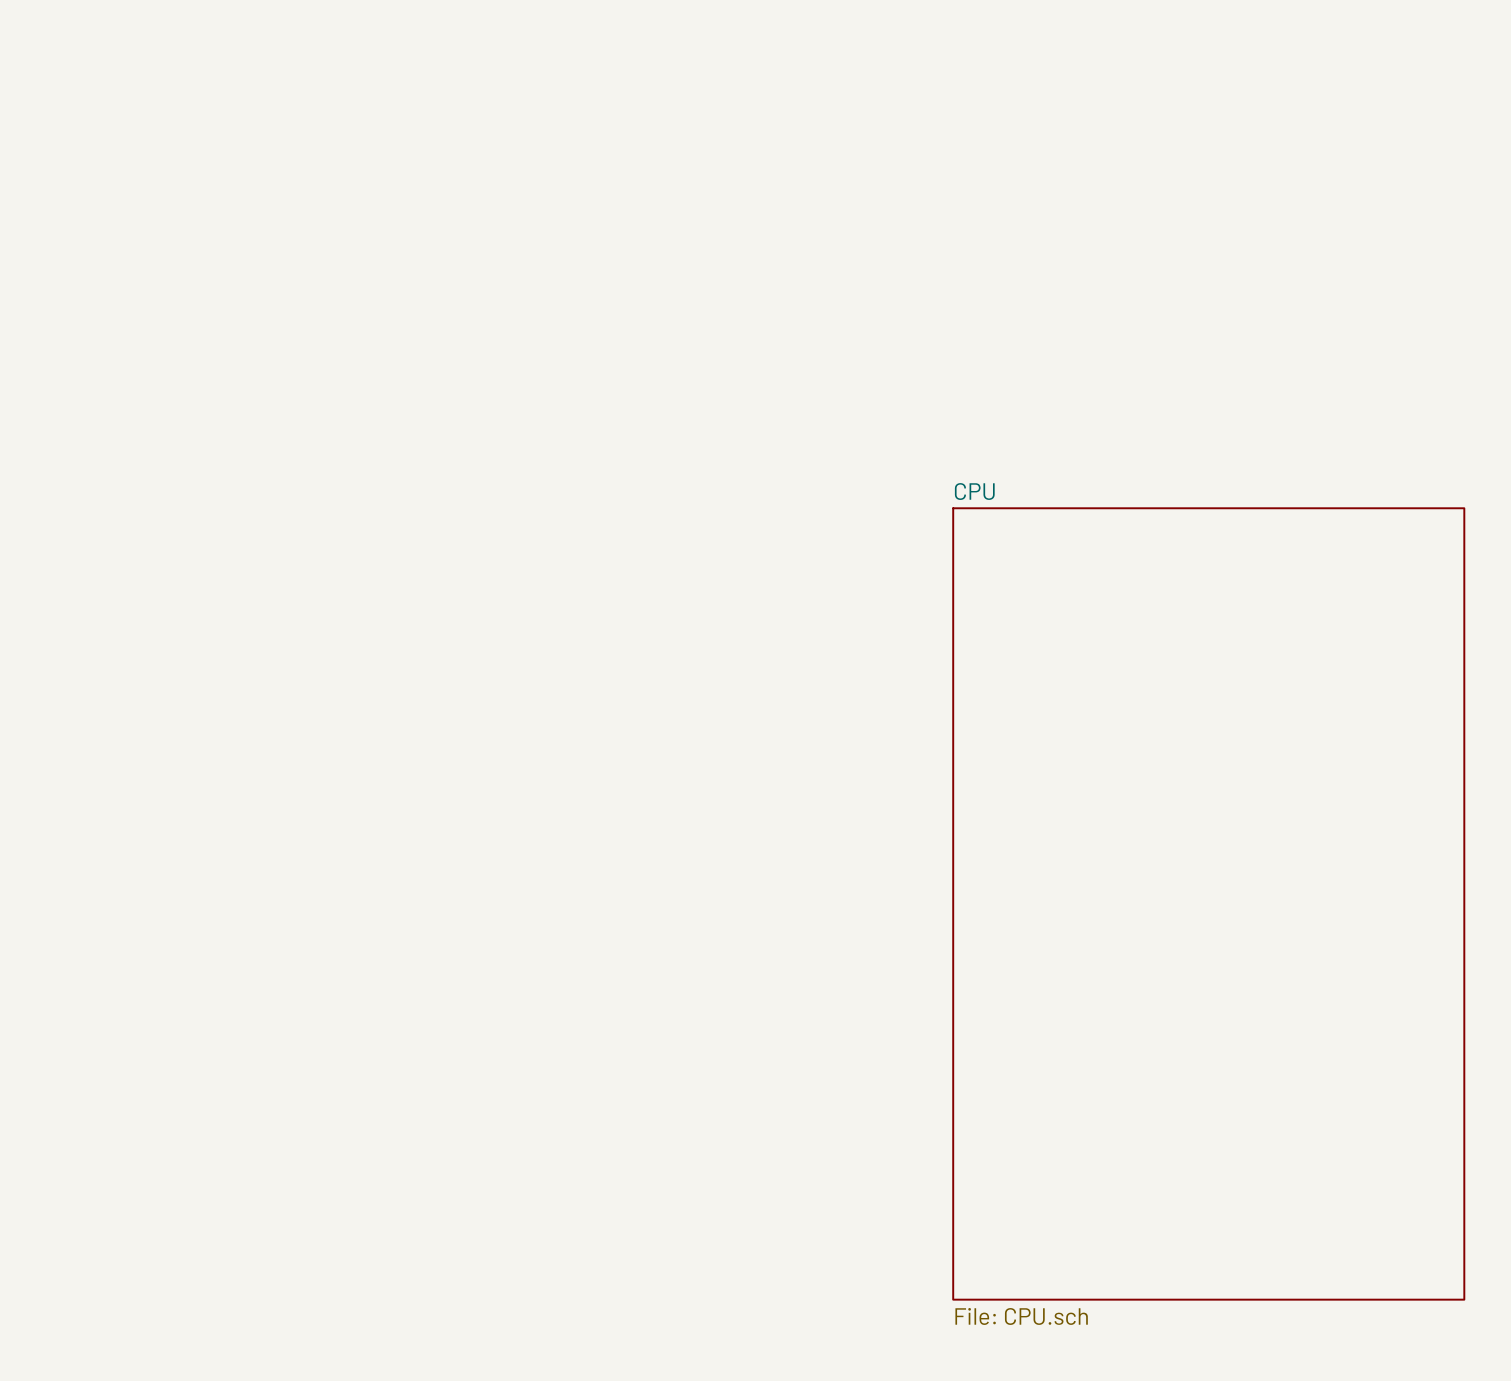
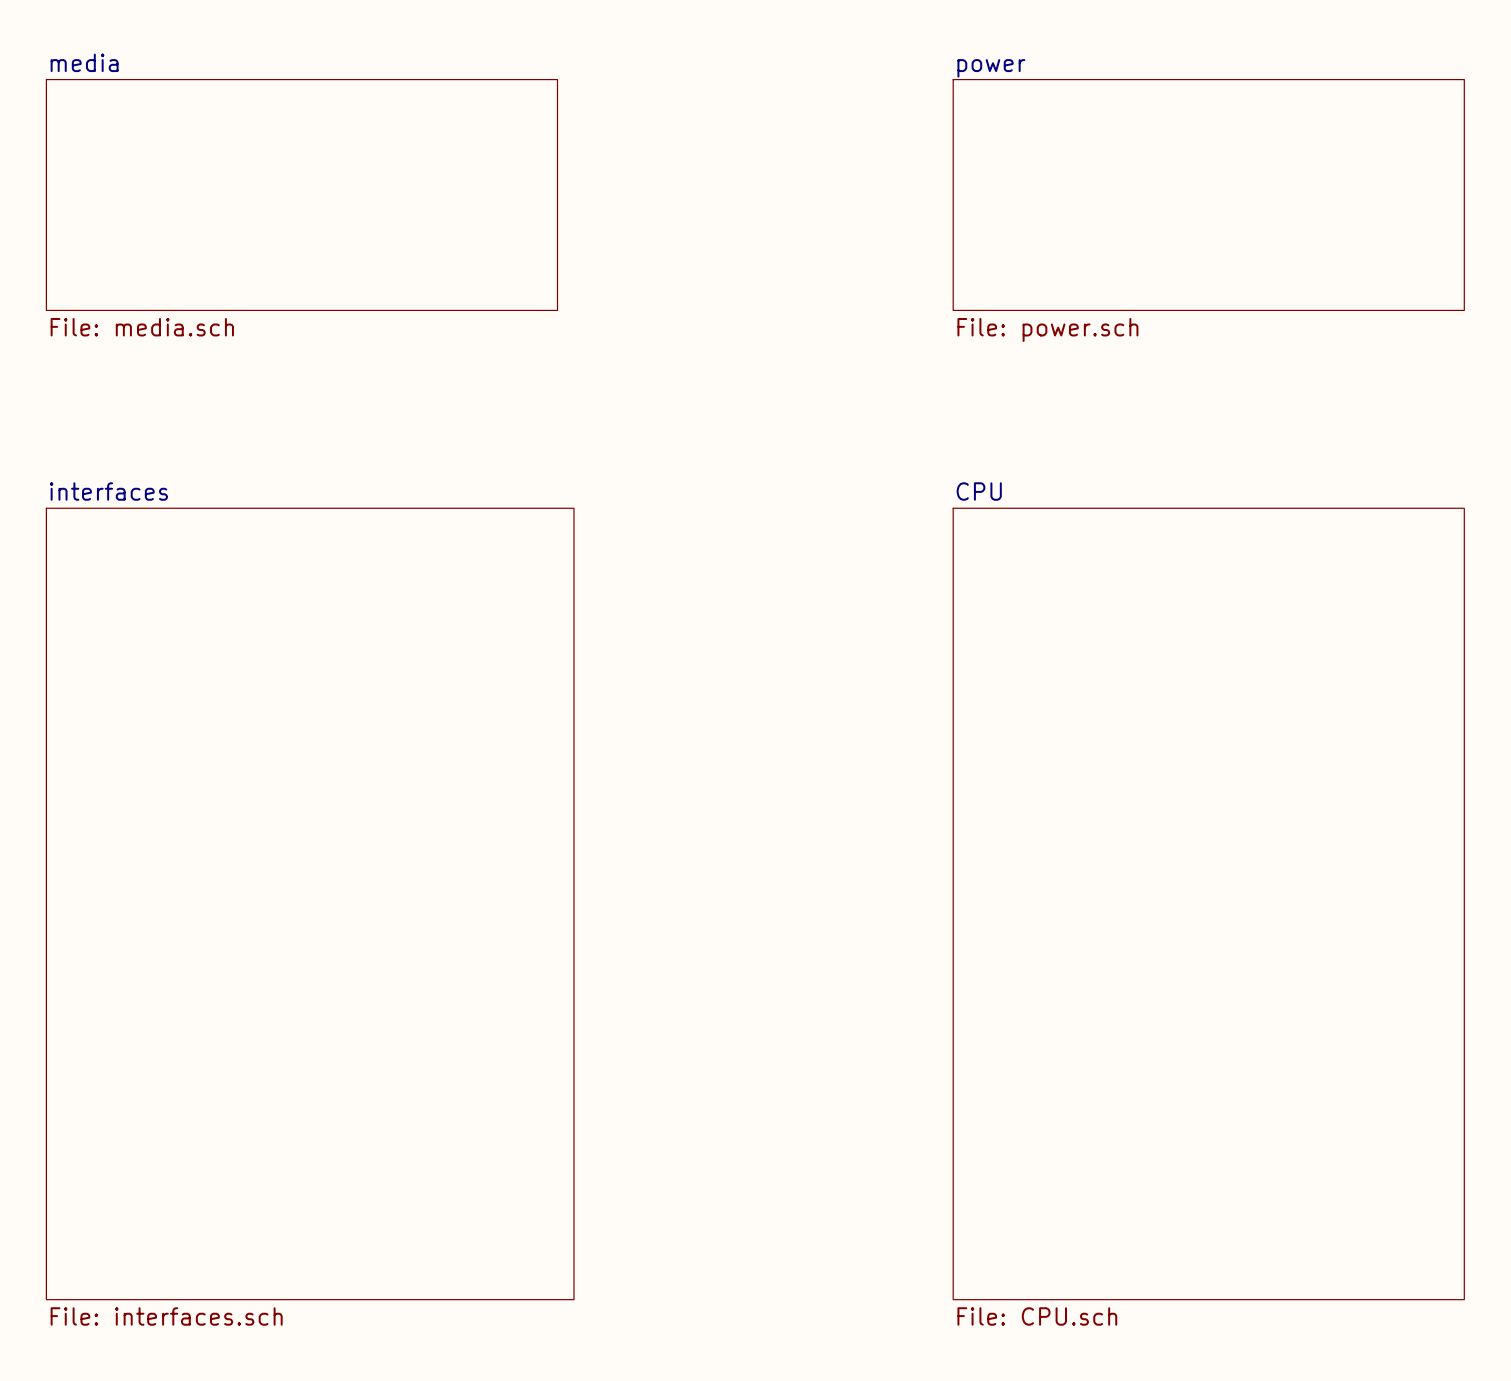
sheet media: none -> File: media.sch (301, 195)
sheet power: none -> File: power.sch (1208, 195)
sheet interfaces: none -> File: interfaces.sch (310, 903)

